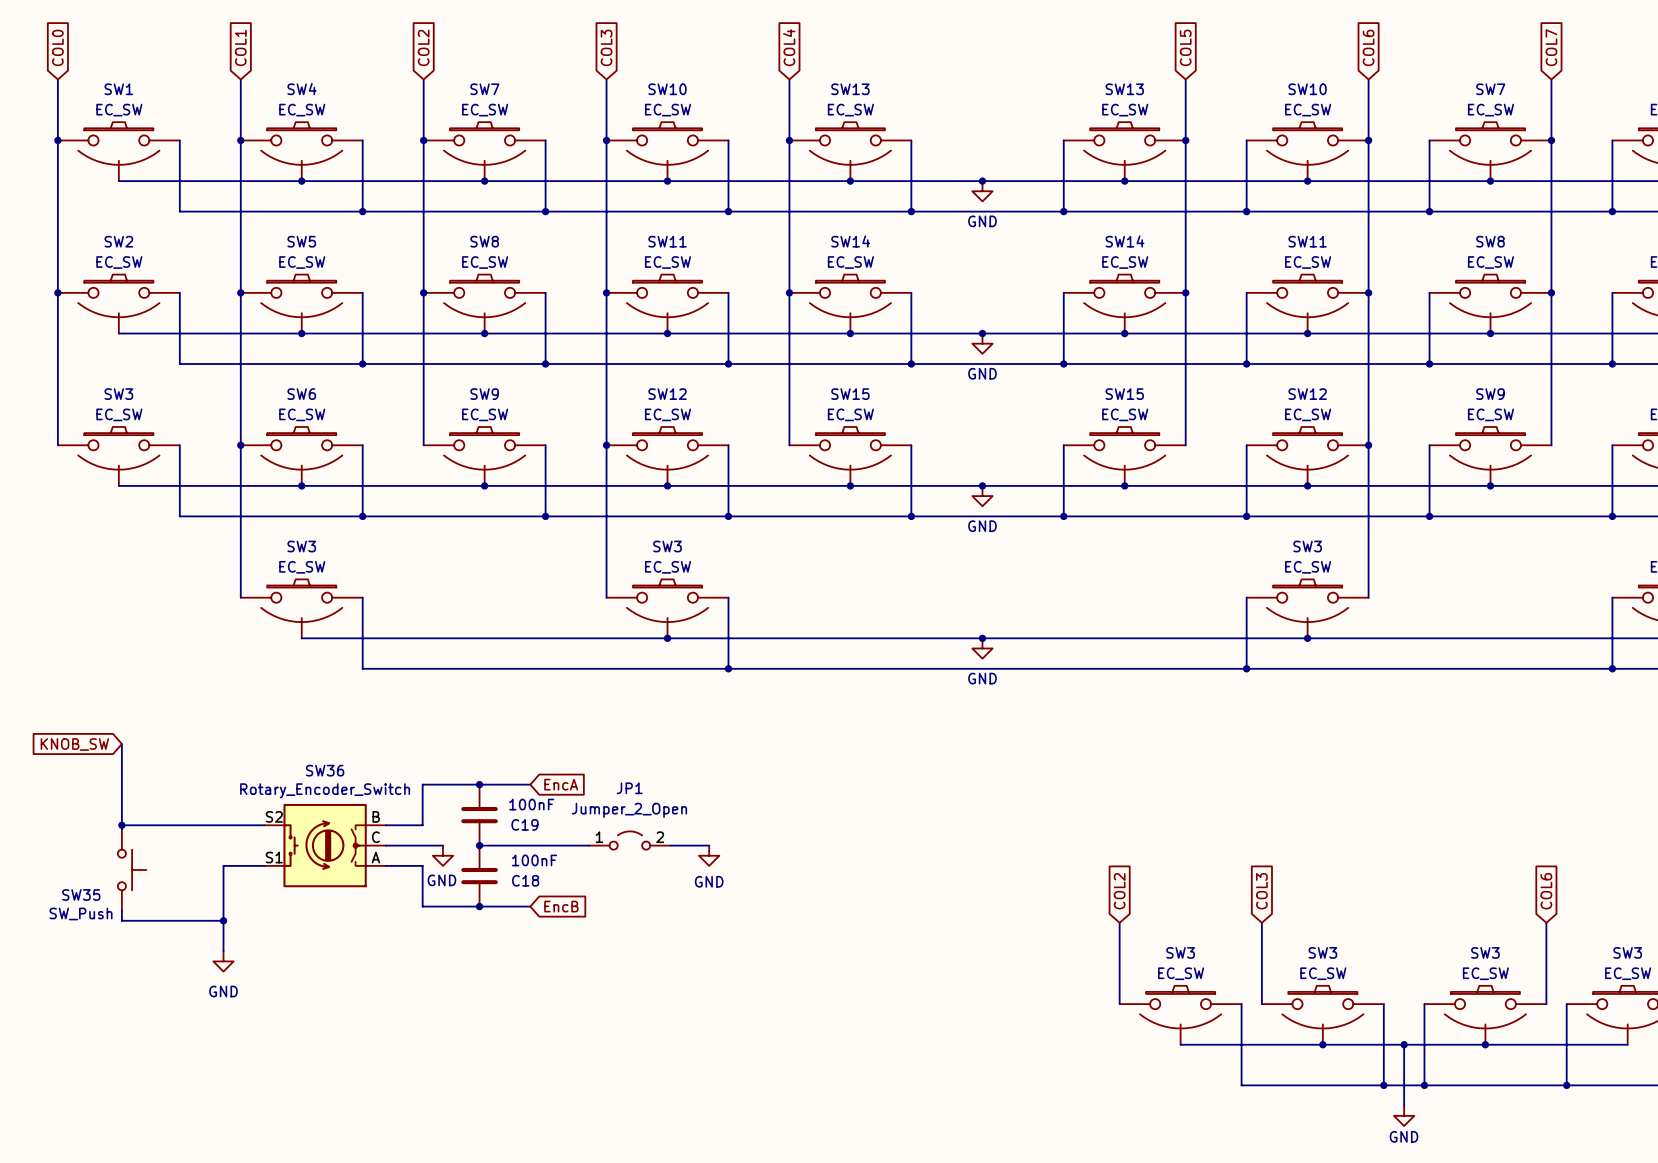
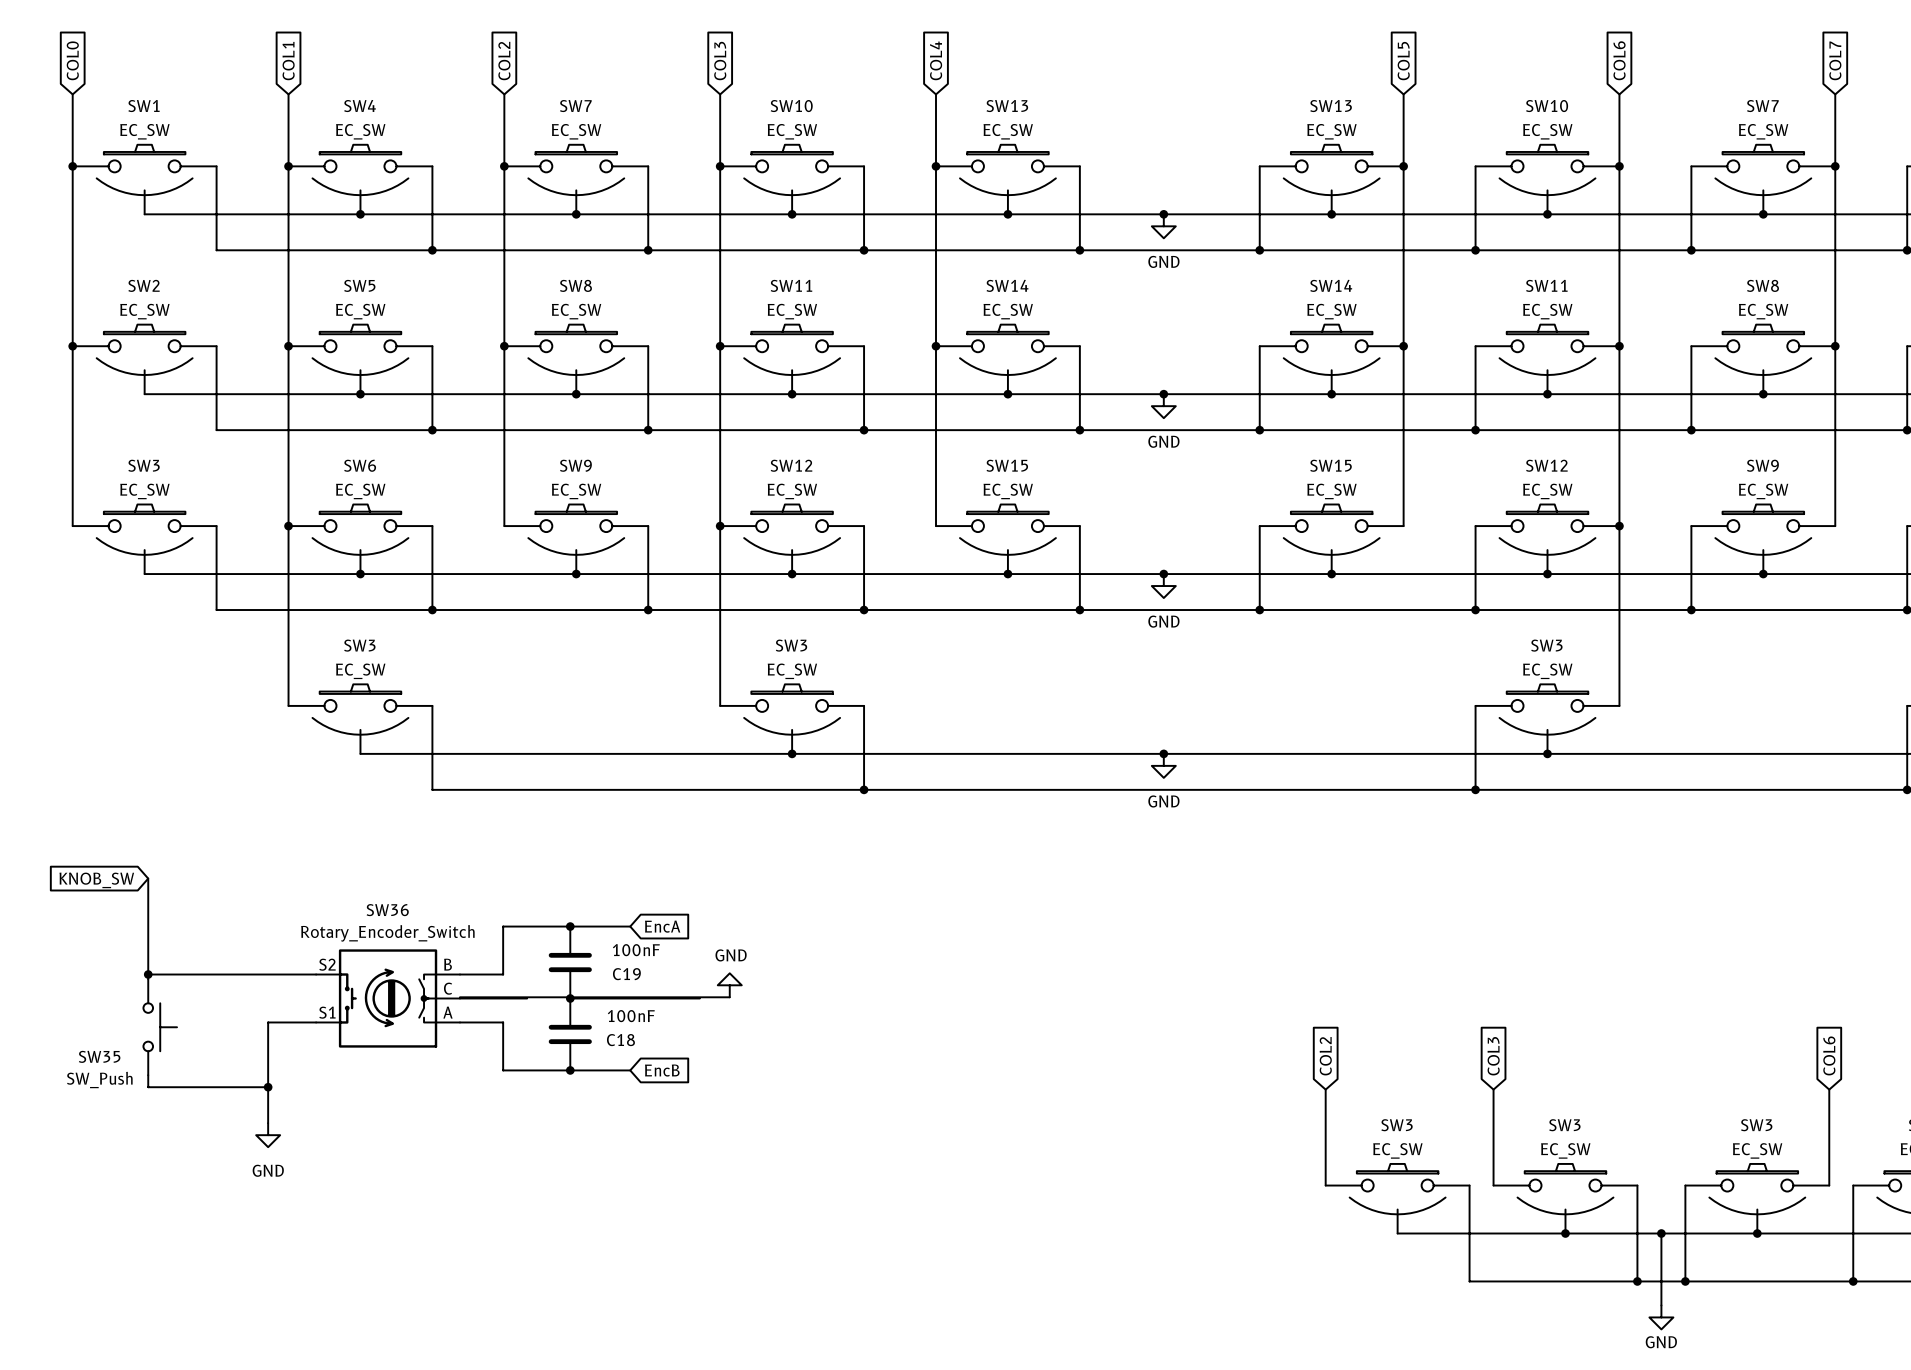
power symbol: none -> GND (729, 985)
JP1: Jumper_2_Open (629, 840) -> none
wire: none -> (459, 997) (729, 997)
wire: (670, 845) (709, 845) -> none
power symbol: GND (442, 855) -> none
power symbol: GND (709, 855) -> none

